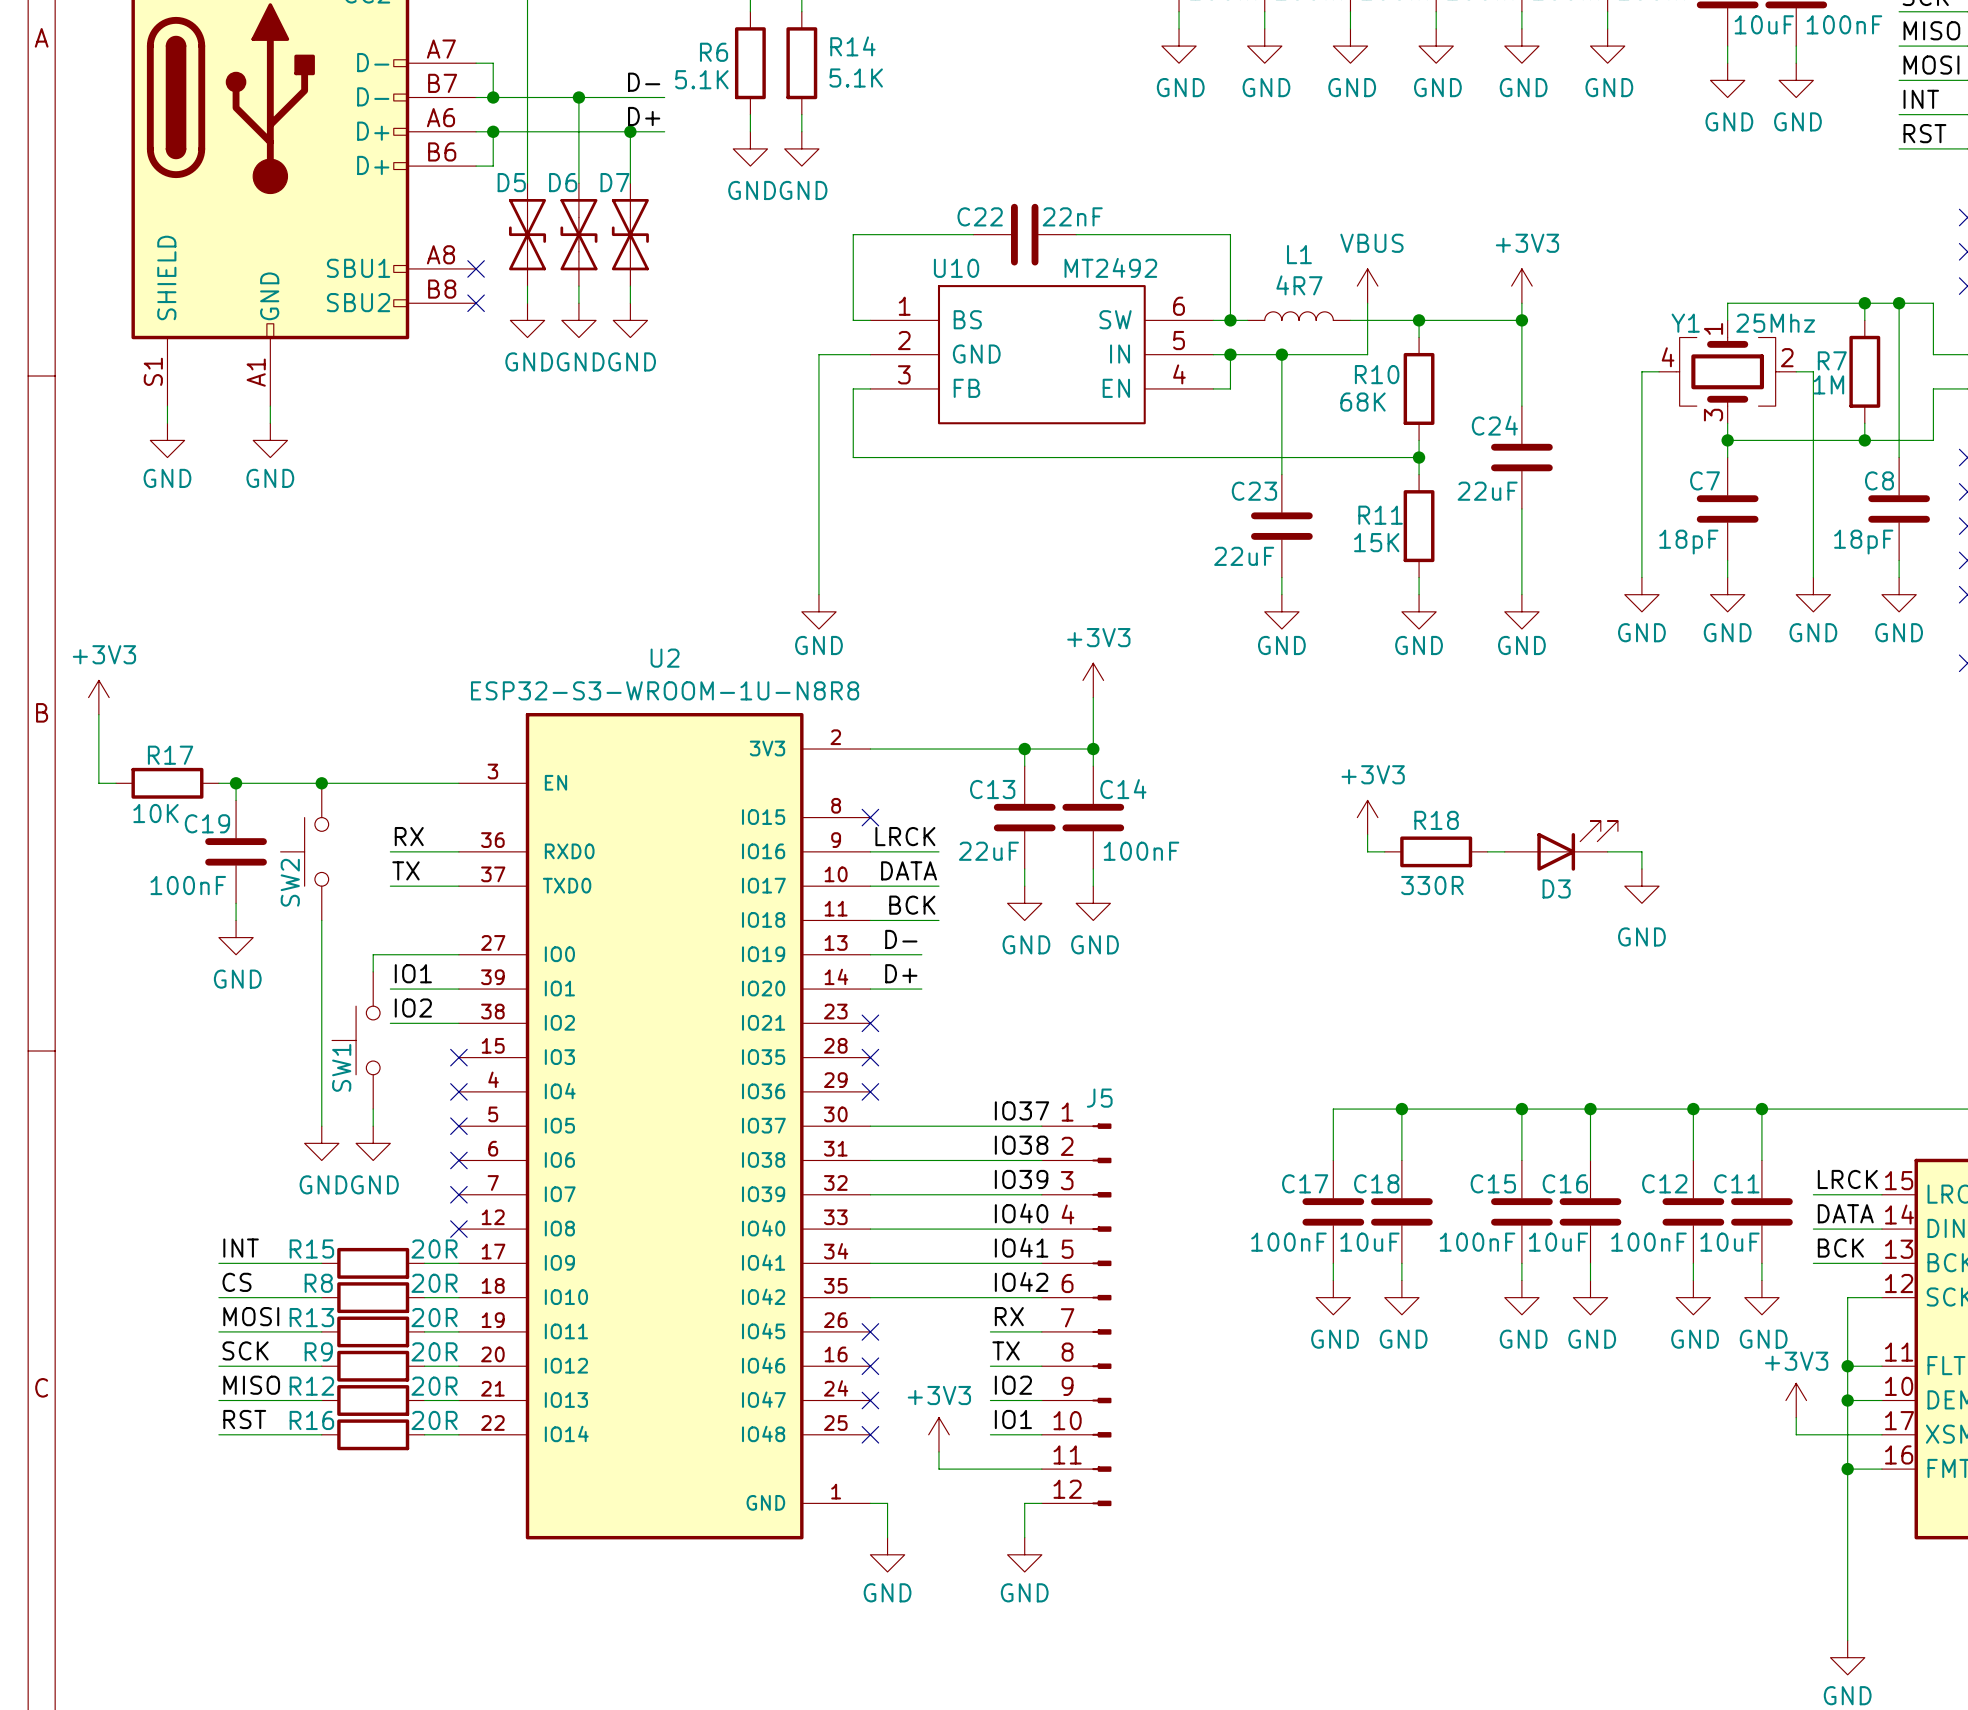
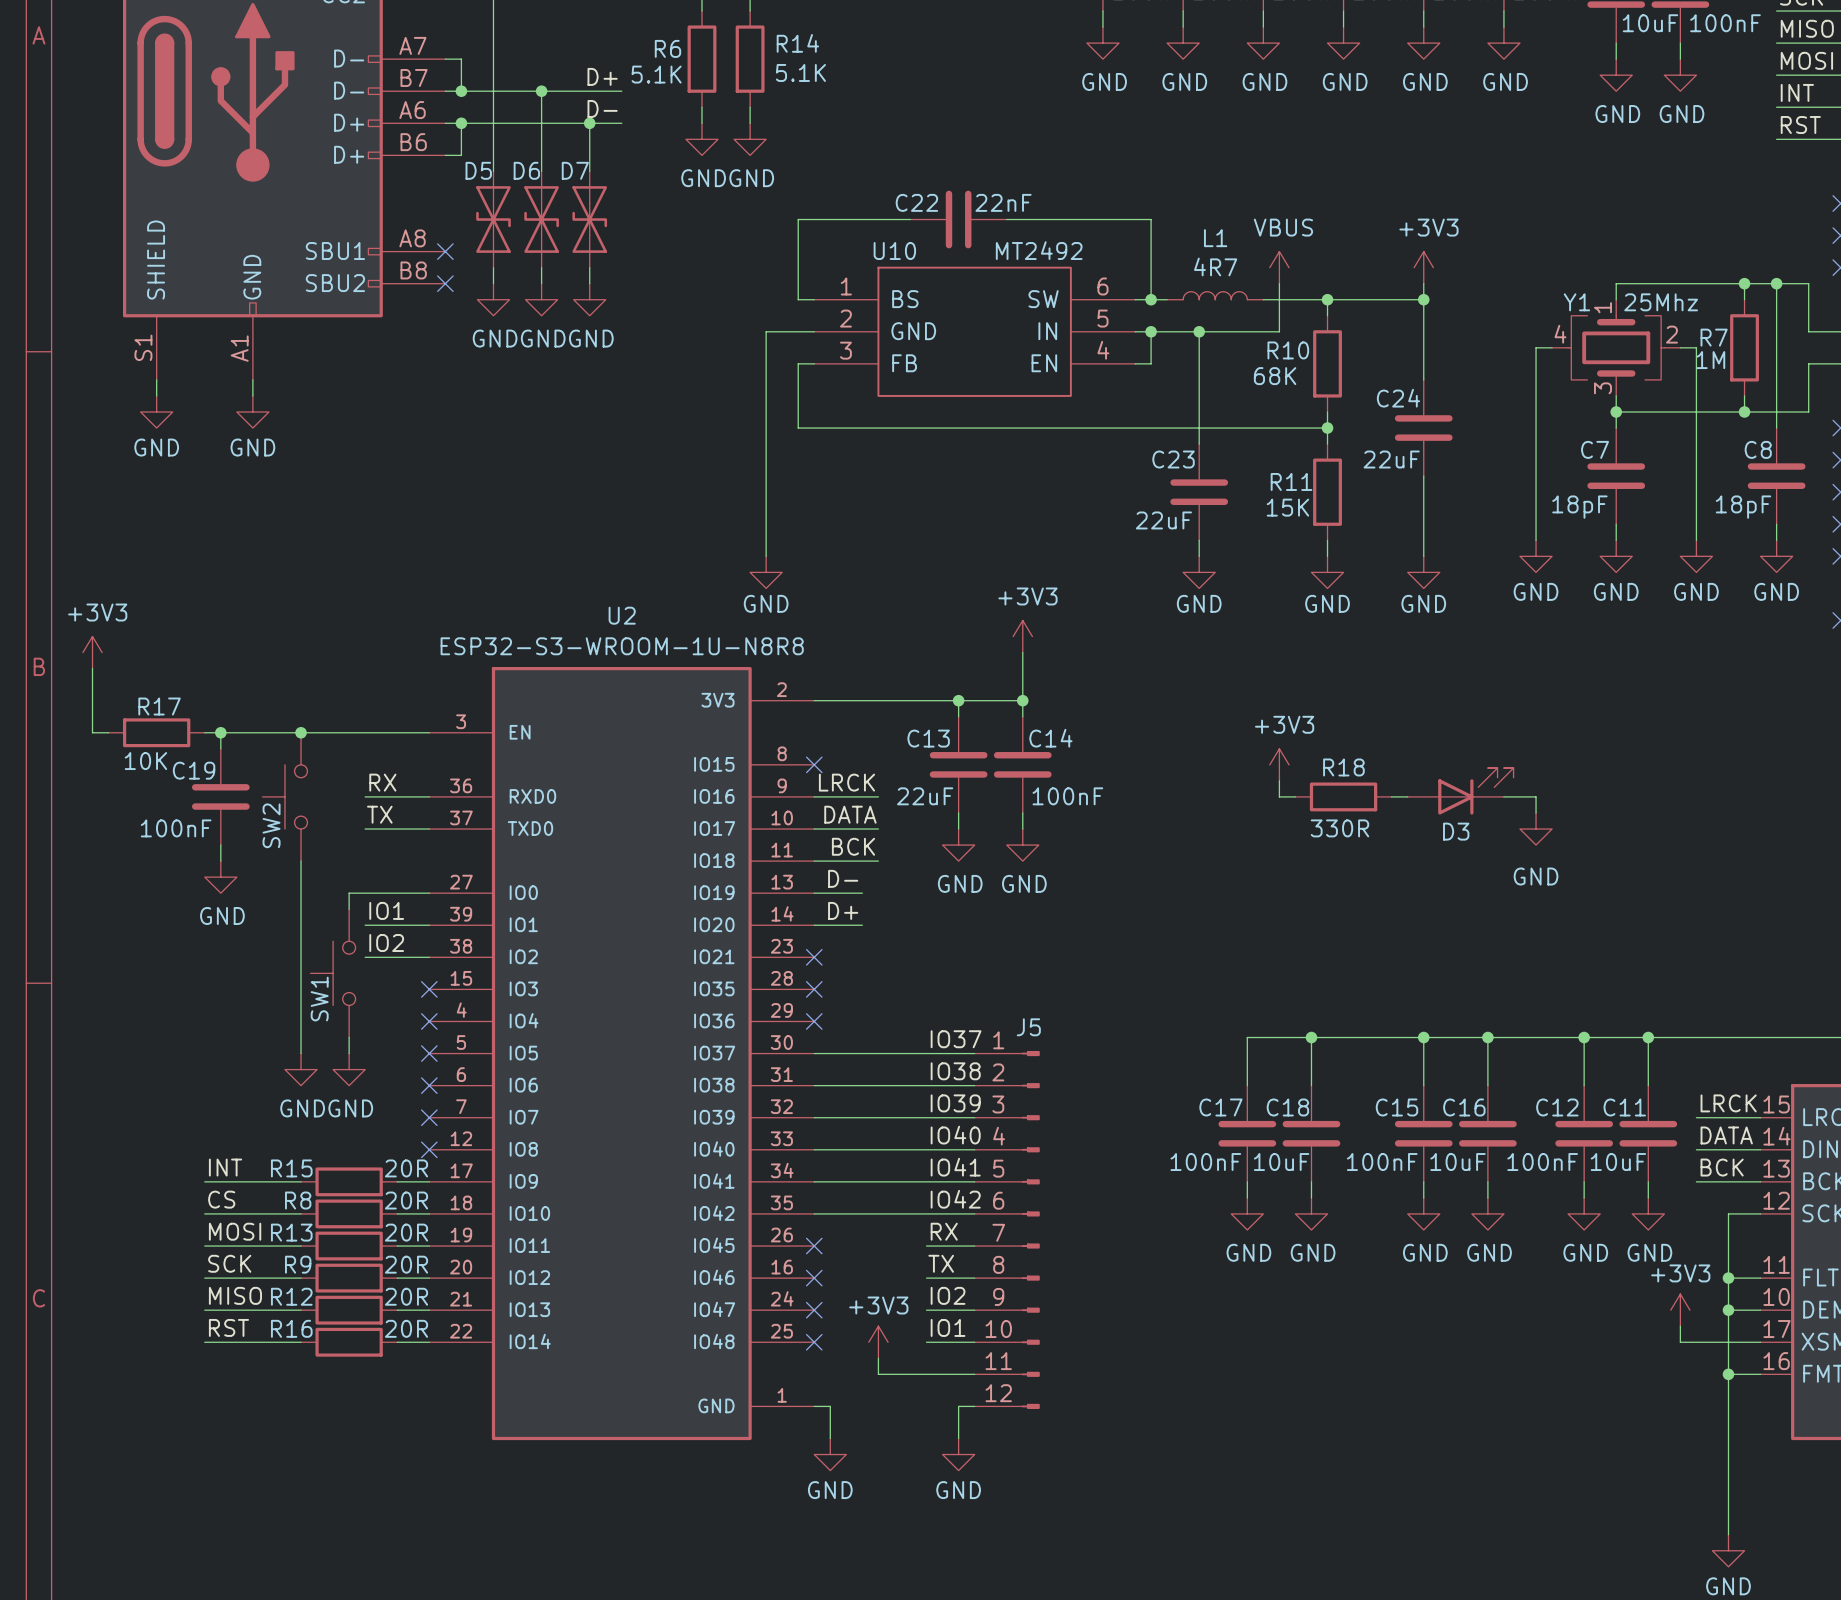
label: D- (644, 82) -> D+ (602, 76)
label: D+ (644, 116) -> D- (602, 108)

